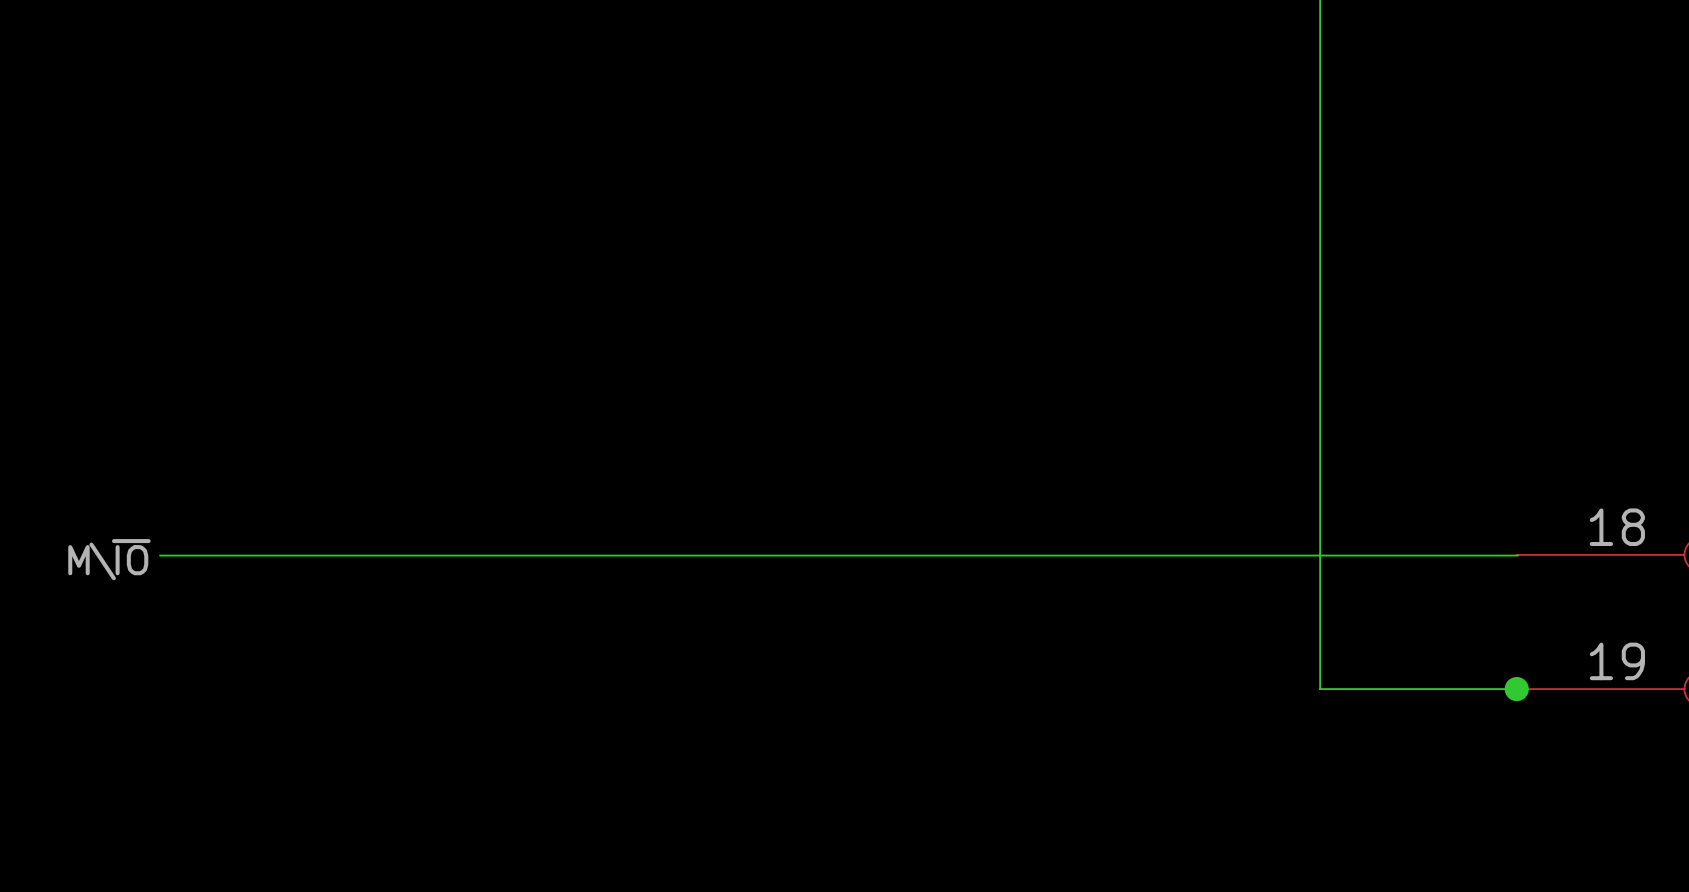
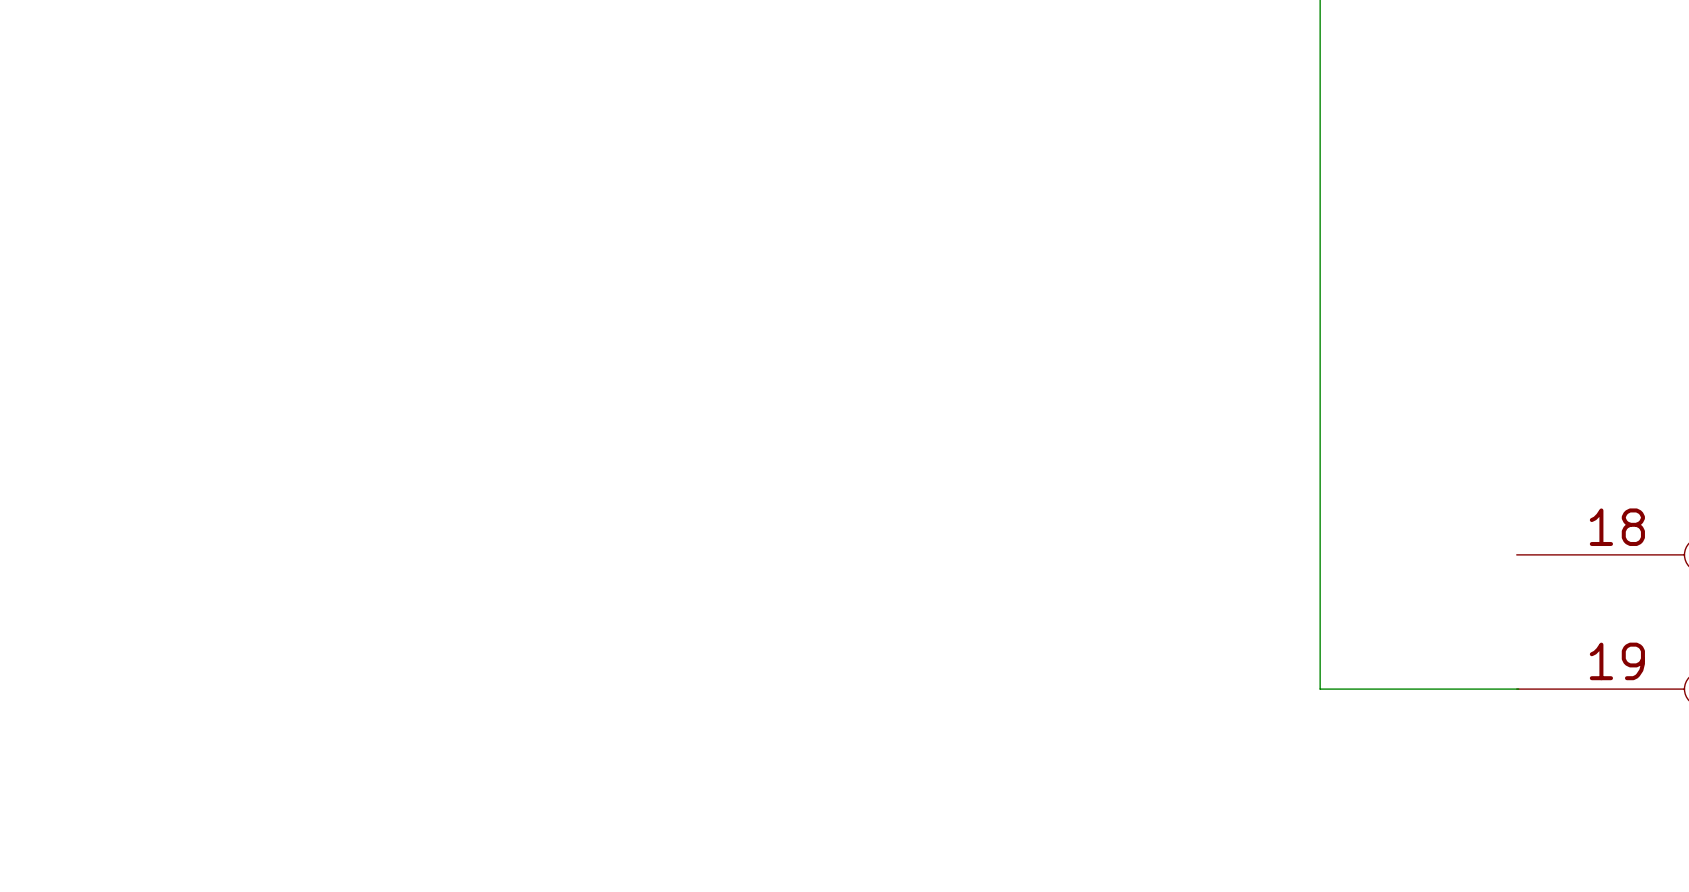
wire: (160, 555) (1518, 555) -> none
label: M\~{IO} (109, 559) -> none
junction: (1516, 689) -> none

